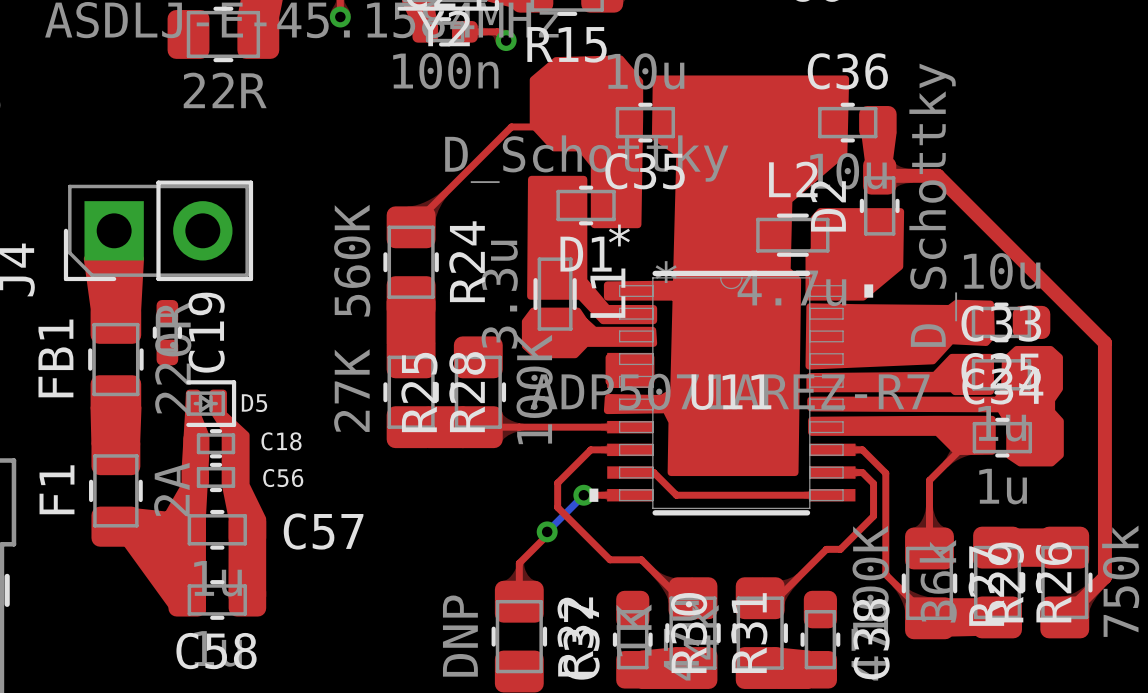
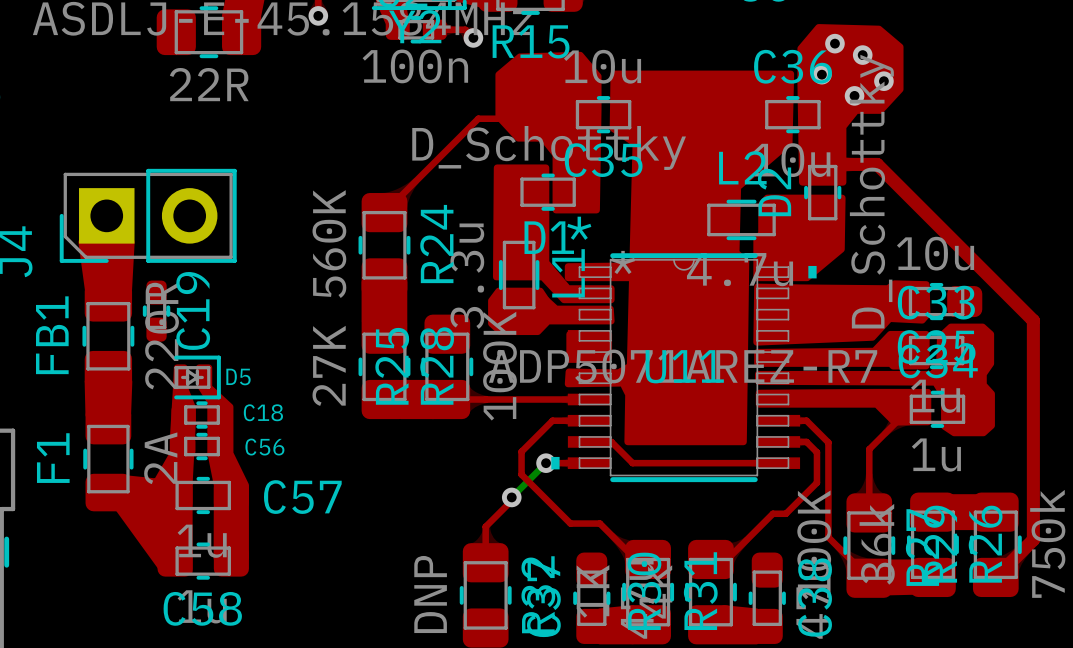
drawing: none -> [797, 24, 904, 186]
via: none -> (834, 43)
via: none -> (862, 55)
via: none -> (821, 74)
via: none -> (883, 81)
via: none -> (854, 95)

